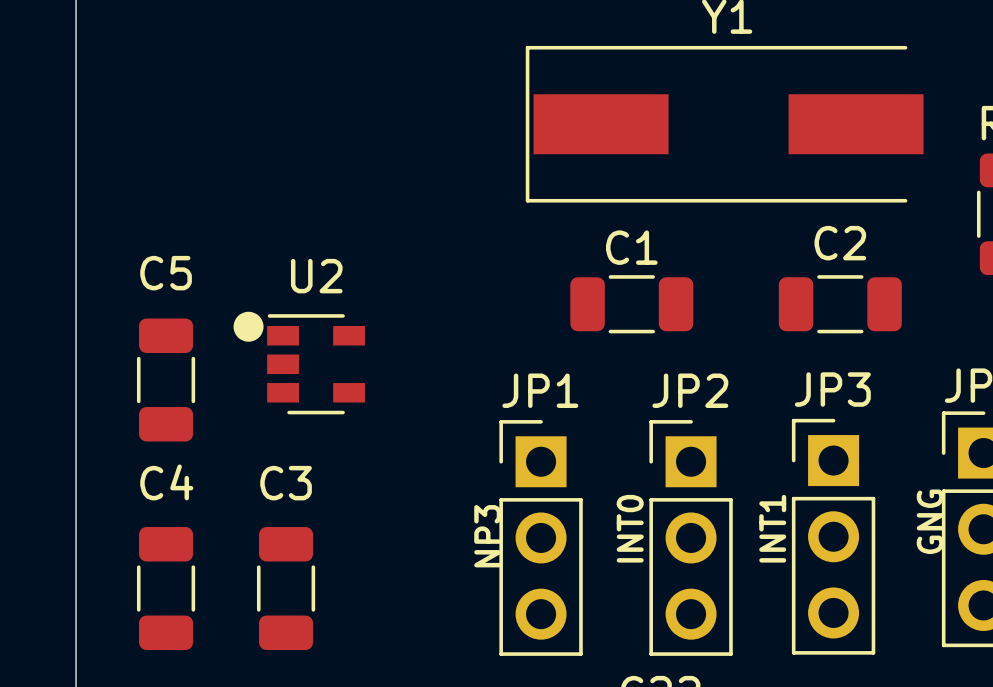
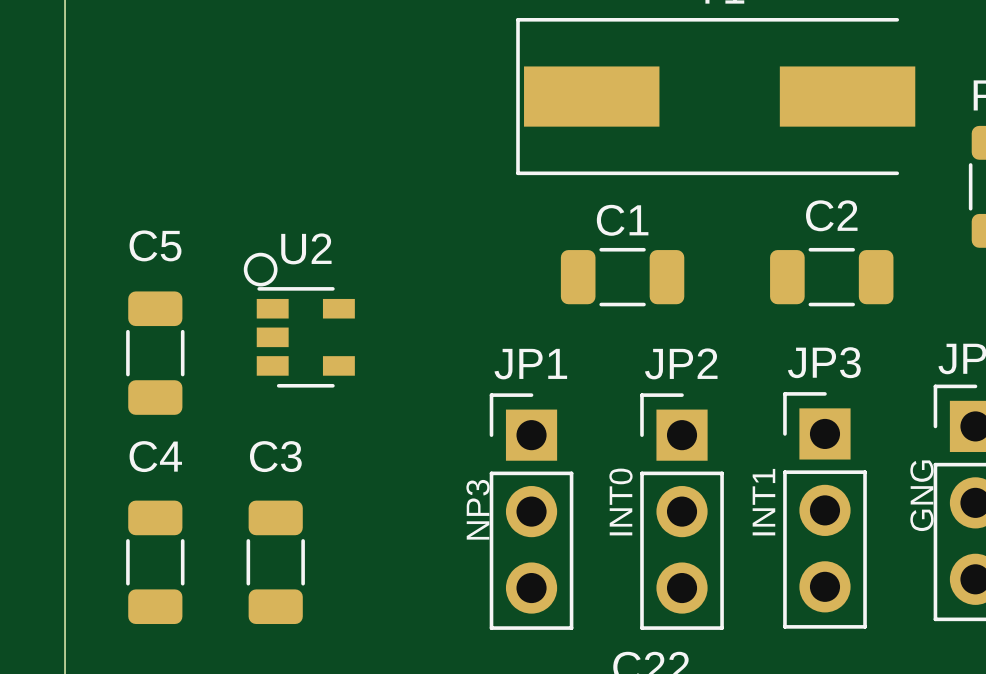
drawing: none -> [243, 252, 278, 287]
drawing: [233, 311, 264, 342] -> none

